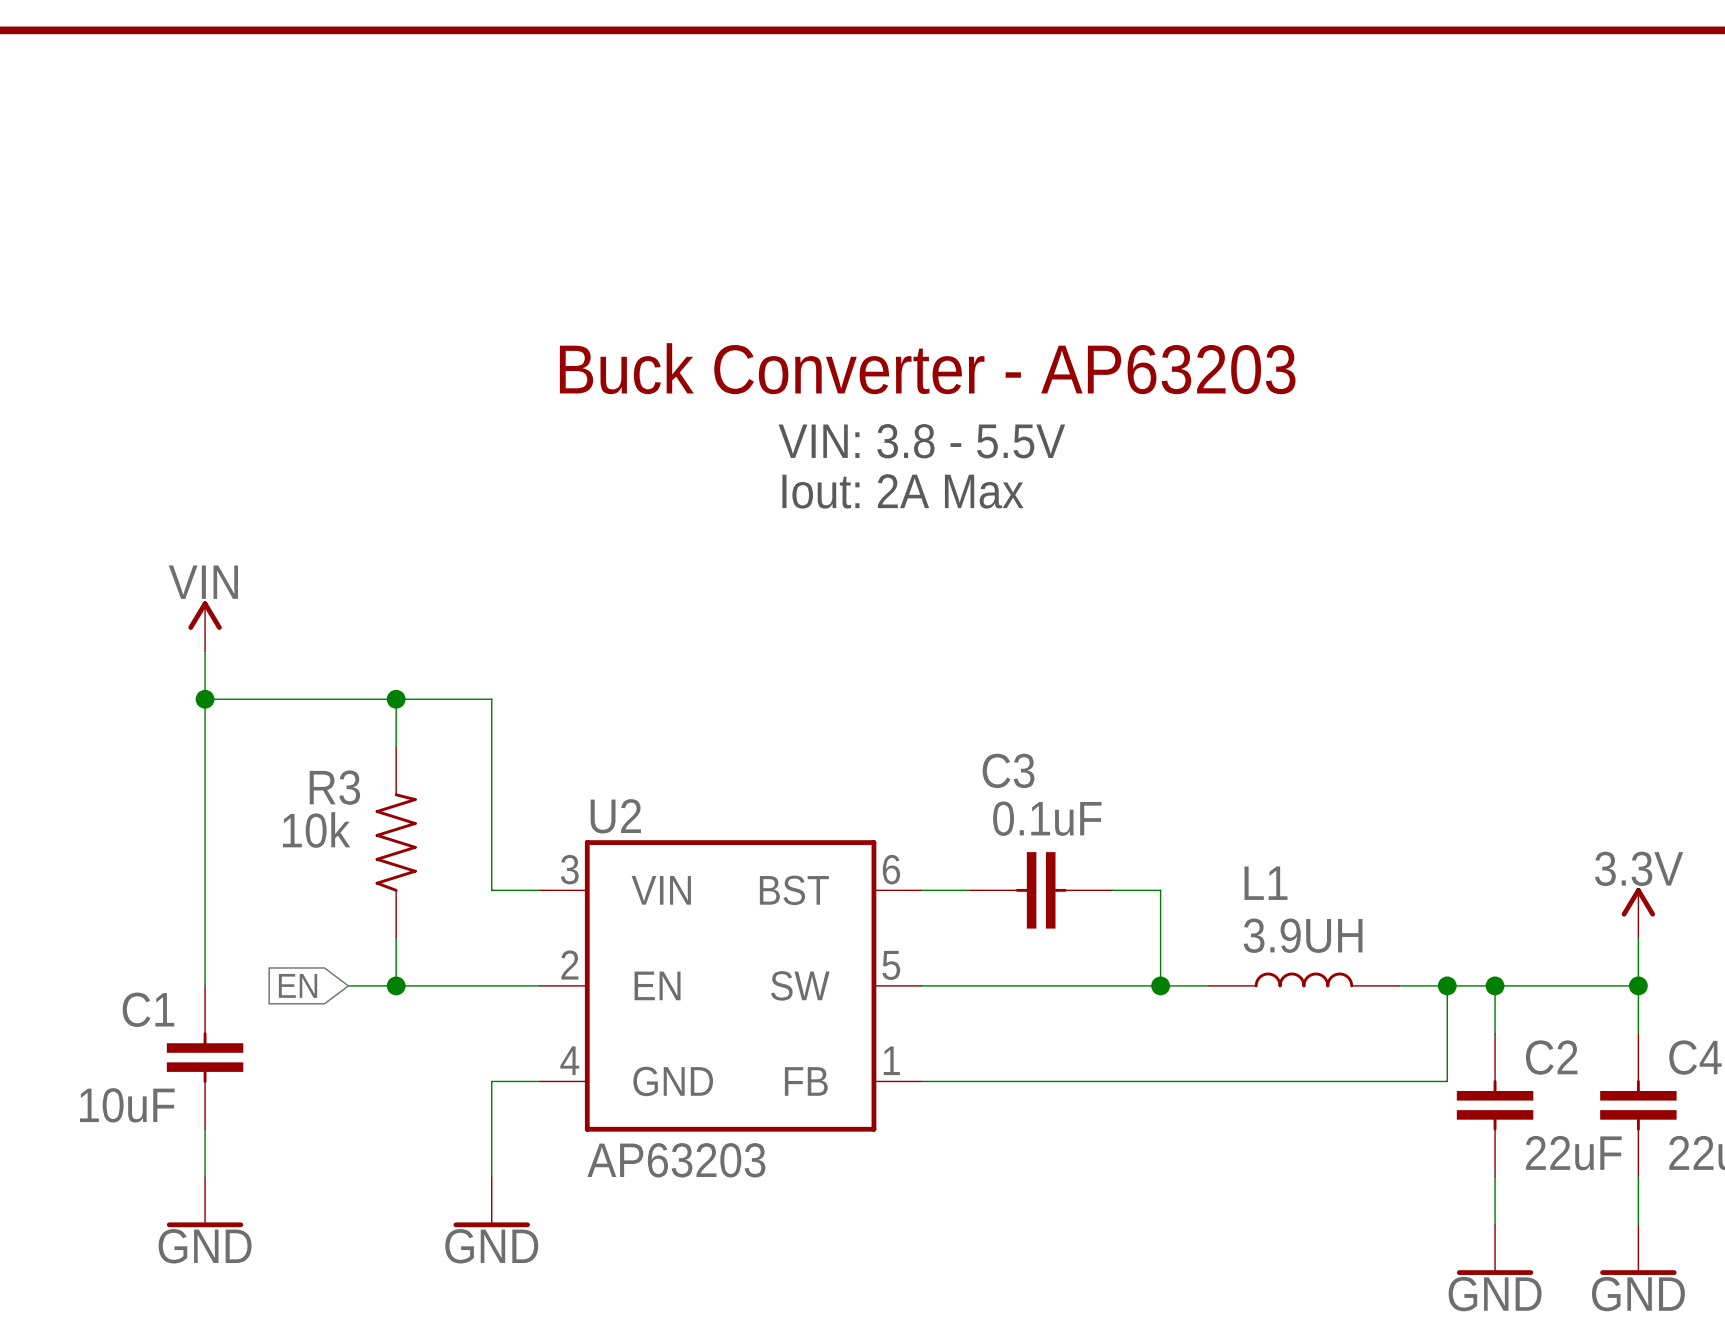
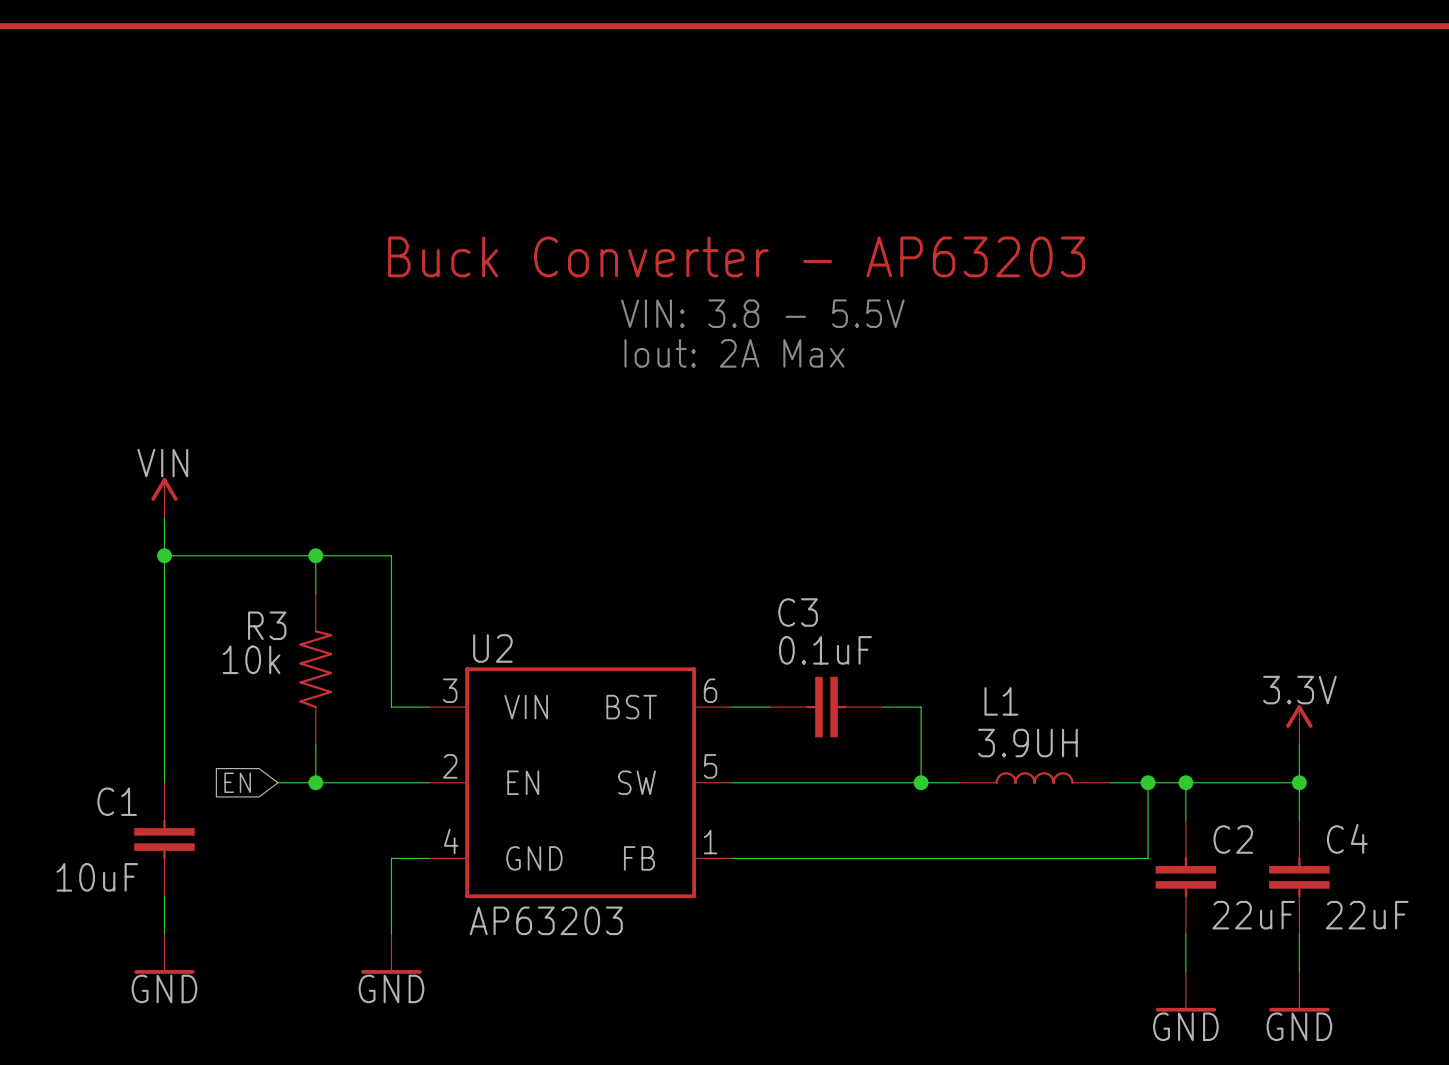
text position: Buck Converter - AP63203 (927, 368) -> Buck Converter - AP63203 (736, 256)
text: none -> VIN: 3.8 - 5.5V (762, 313)
text: VIN: 3.8 - 5.5V (921, 441) -> Iout: 2A Max (734, 353)
text: Iout: 2A Max (902, 491) -> none

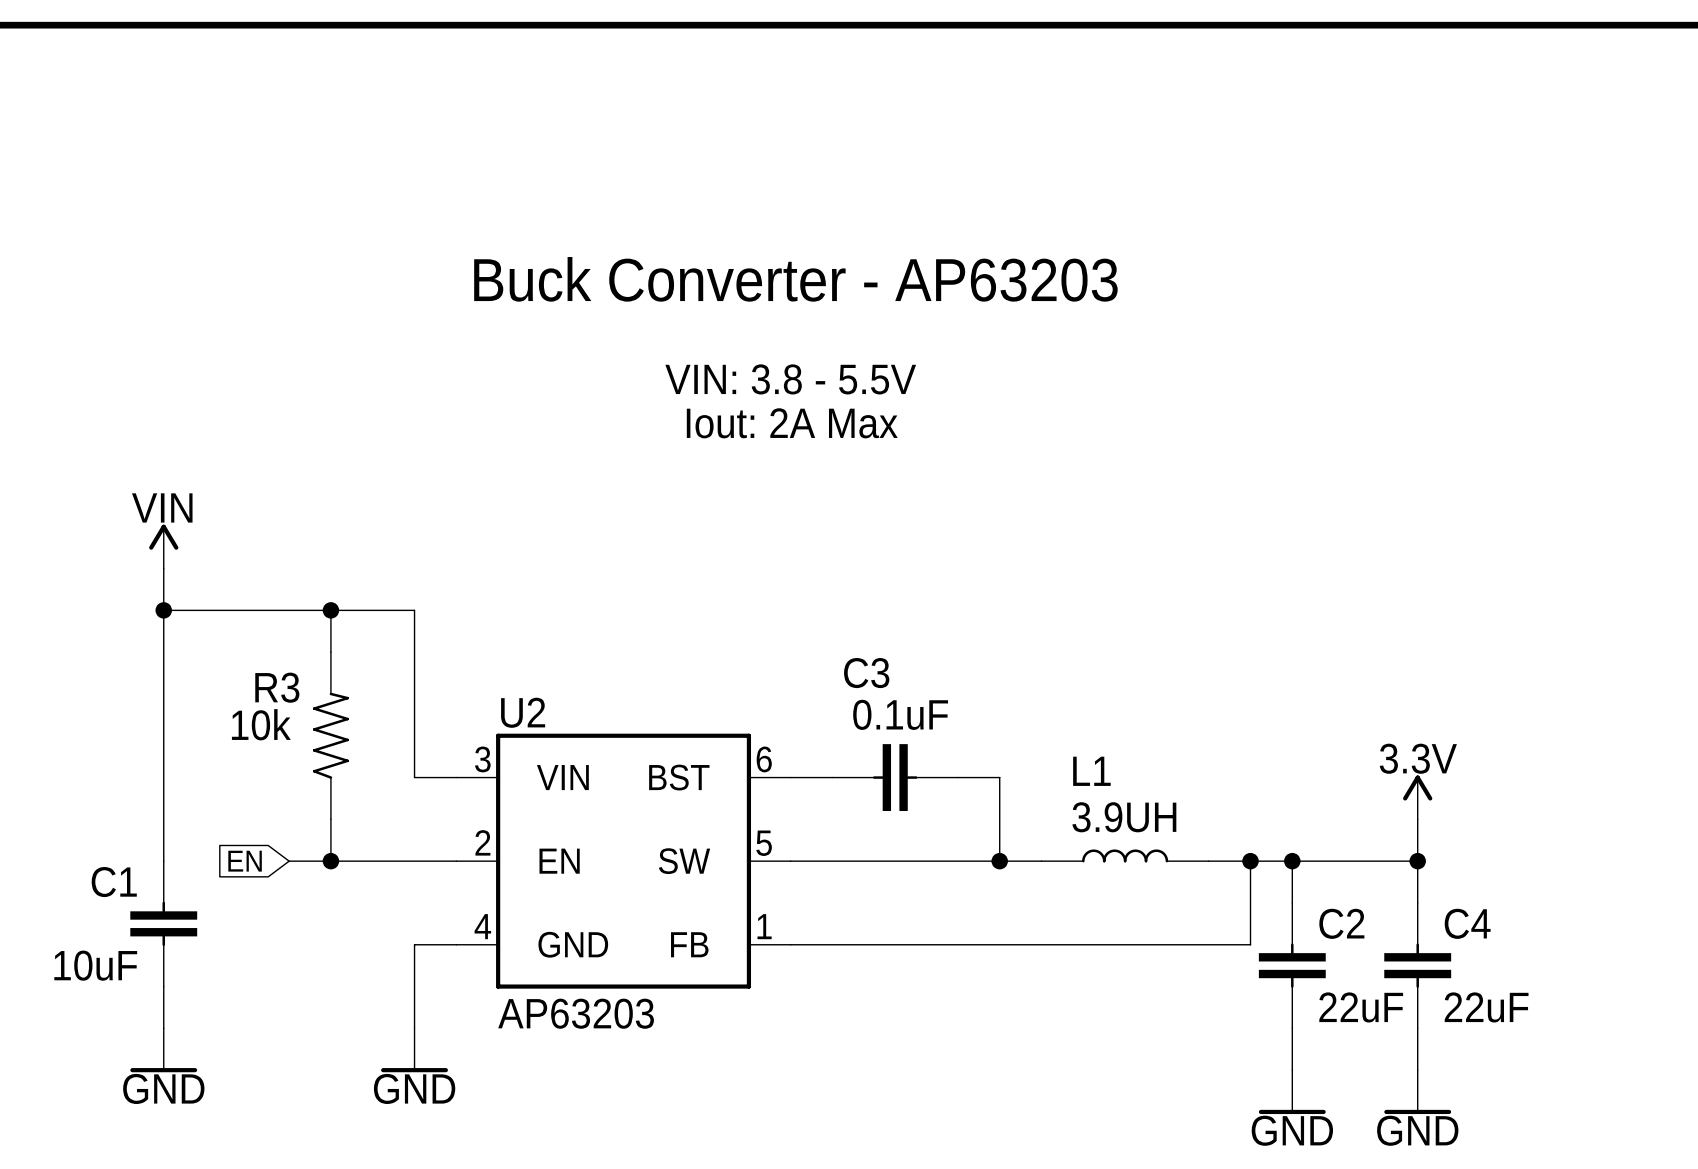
text position: VIN: 3.8 - 5.5V (762, 313) -> VIN: 3.8 - 5.5V (790, 379)
text position: Iout: 2A Max (734, 353) -> Iout: 2A Max (792, 423)

